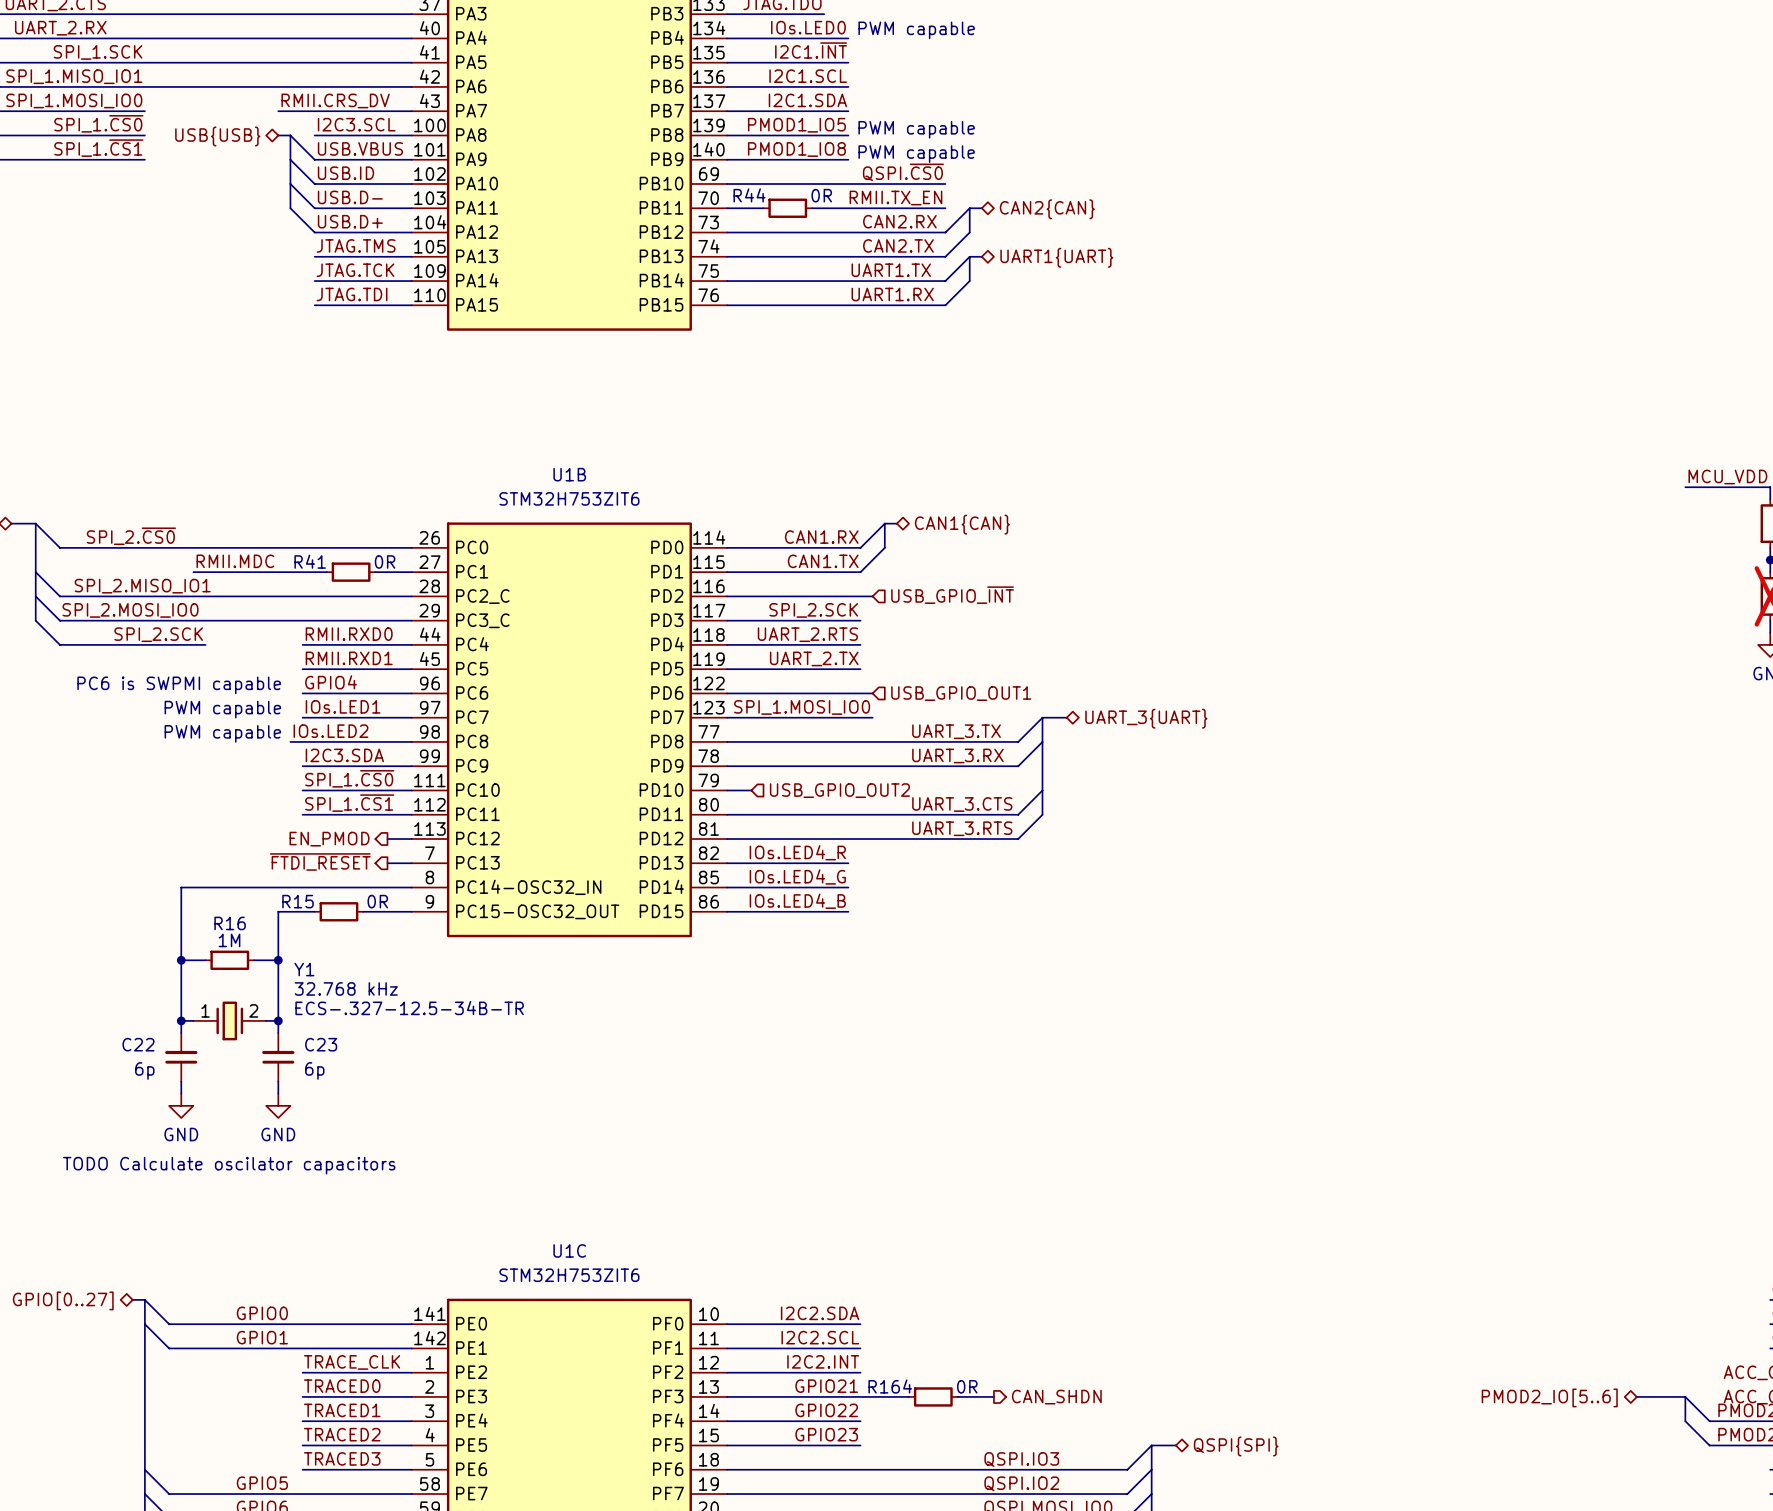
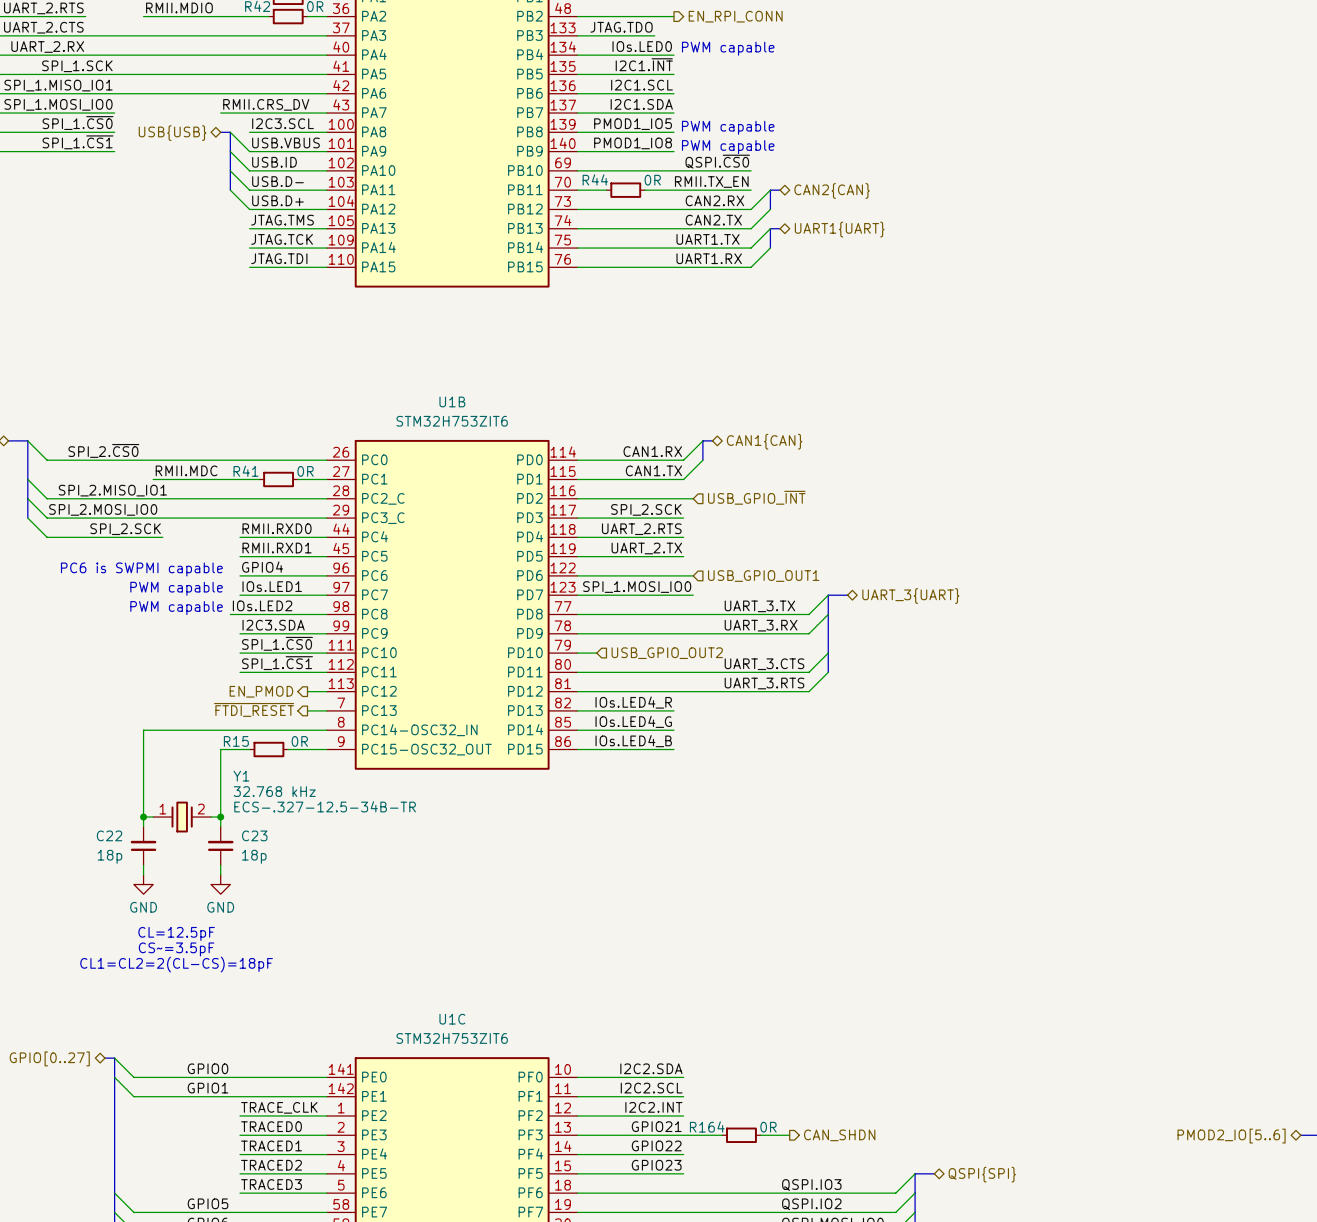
wire: (181, 960) (205, 960) -> none
junction: (181, 960) -> none
R16: (229, 960) -> none
wire: (254, 960) (278, 960) -> none
junction: (278, 960) -> none
junction: none -> (143, 817)
junction: none -> (220, 817)
wire: (181, 1020) (193, 1020) -> (143, 817) (153, 817)
junction: (181, 1020) -> none
Y1 position: (229, 1020) -> (182, 817)
wire: (266, 1020) (278, 1020) -> (211, 817) (220, 817)
junction: (278, 1020) -> none
C22 position: (181, 1057) -> (143, 845)
C23 position: (278, 1057) -> (220, 845)
C22 text: 6p (144, 1070) -> 18p (109, 856)
C23 text: 6p (314, 1070) -> 18p (254, 856)
power symbol position: GND (181, 1105) -> GND (143, 884)
power symbol position: GND (278, 1105) -> GND (220, 884)
text: none -> CL=12.5pF (176, 933)
text: TODO Calculate oscilator capacitors (229, 1165) -> CS~=3.5pF (176, 949)
text: none -> CL1=CL2=2(CL-CS)=18pF (176, 964)

